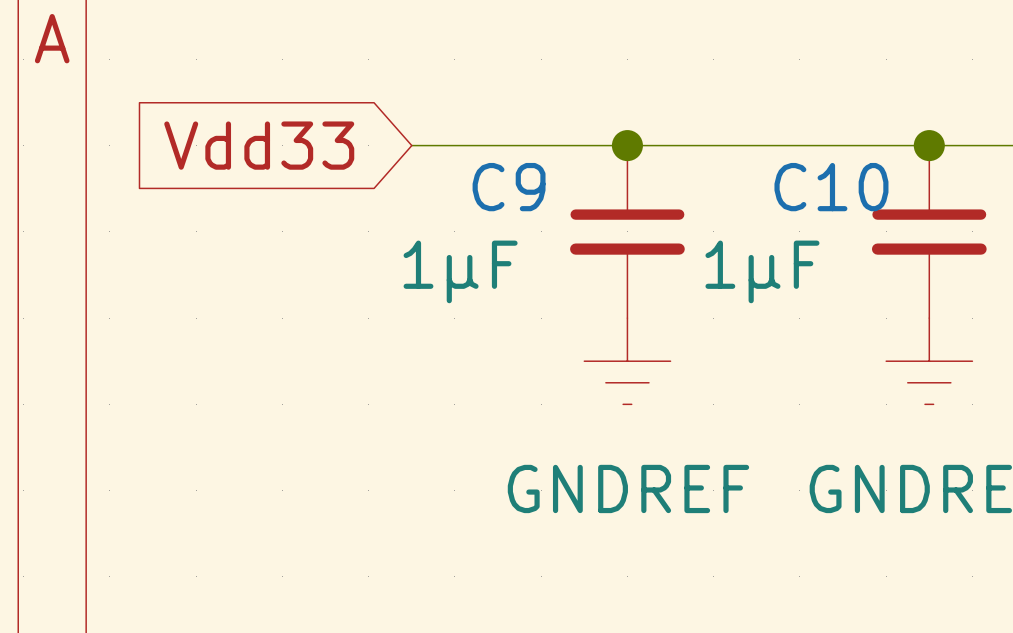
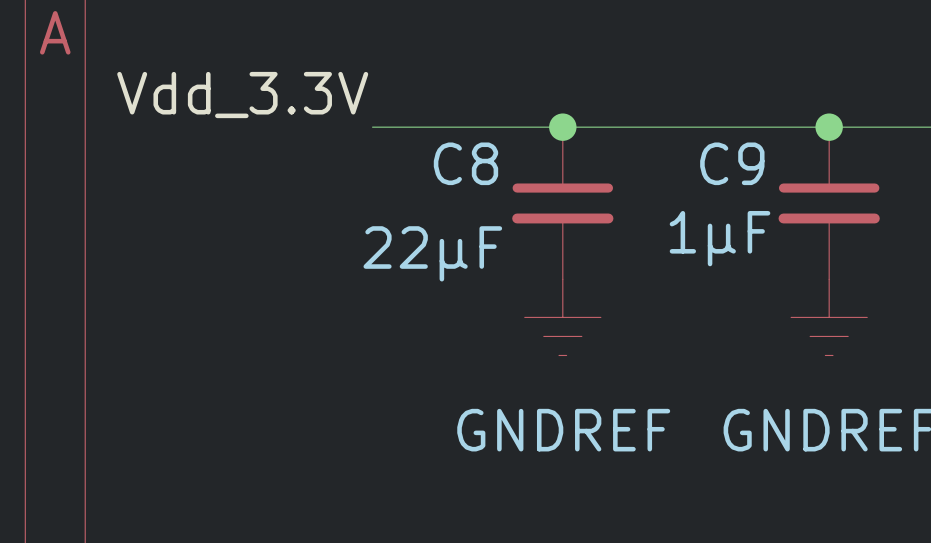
label: none -> Vdd_3.3V (242, 95)
global label: Vdd33 (259, 145) -> none
C9 name: C9 (509, 187) -> C8 (465, 163)
C10 name: C10 (831, 187) -> C9 (732, 163)
C9 value: 1µF (460, 271) -> 22µF (432, 253)
C10 value position: 1µF (762, 271) -> 1µF (720, 238)

